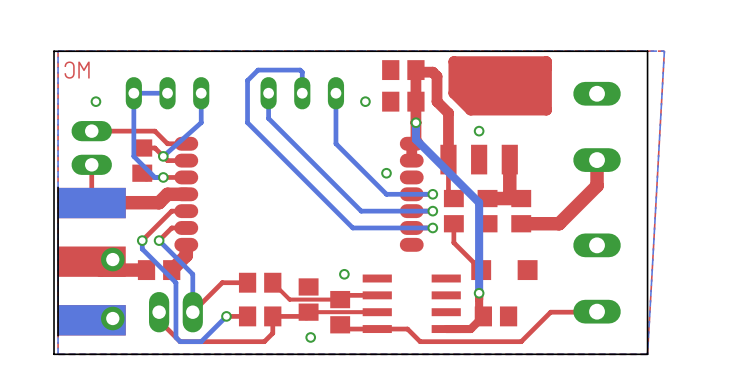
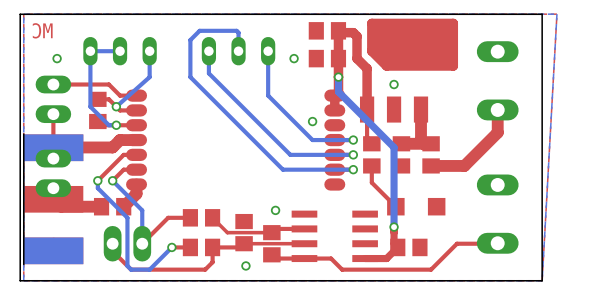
part: none -> (53, 173)
via: (112, 259) -> none
via: (112, 318) -> none

